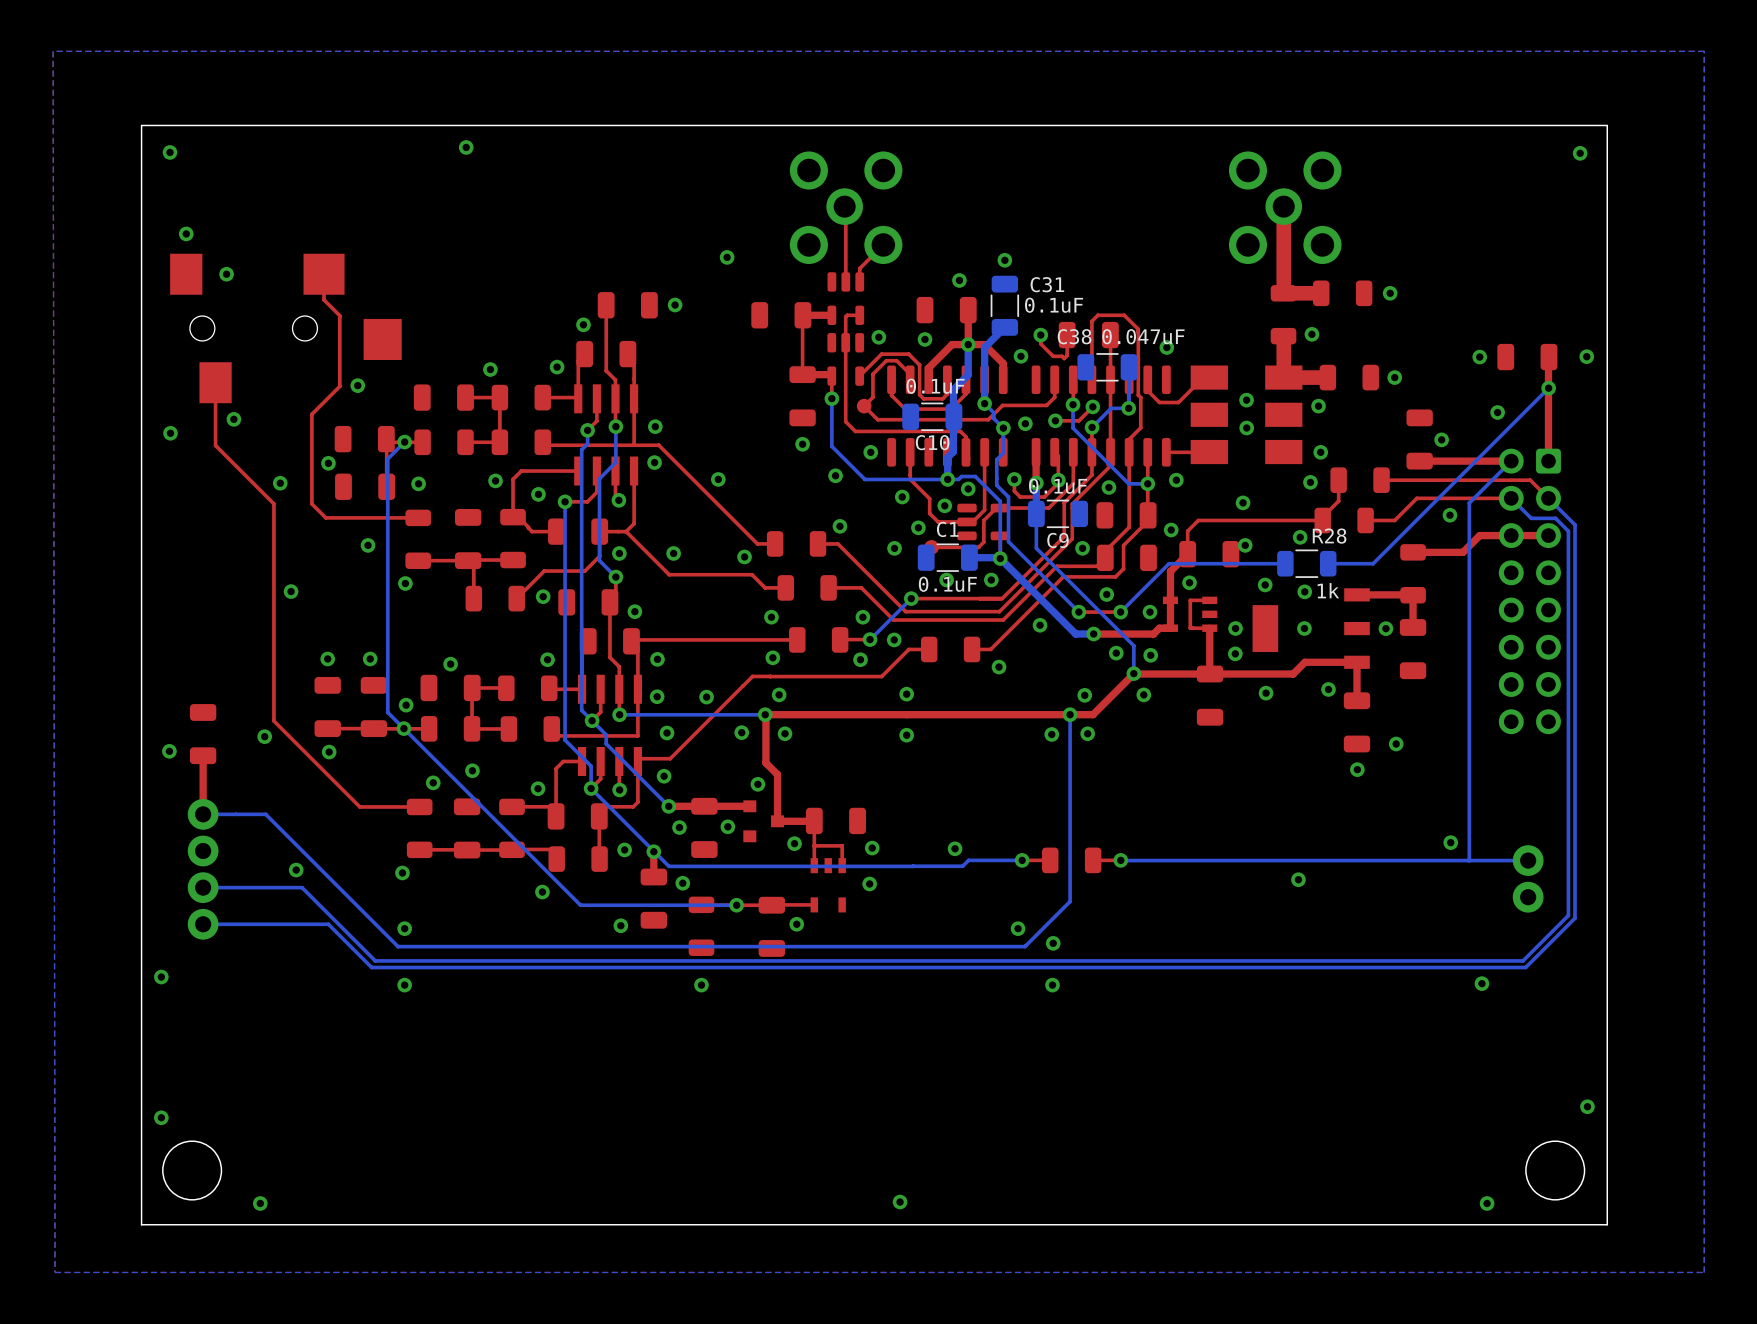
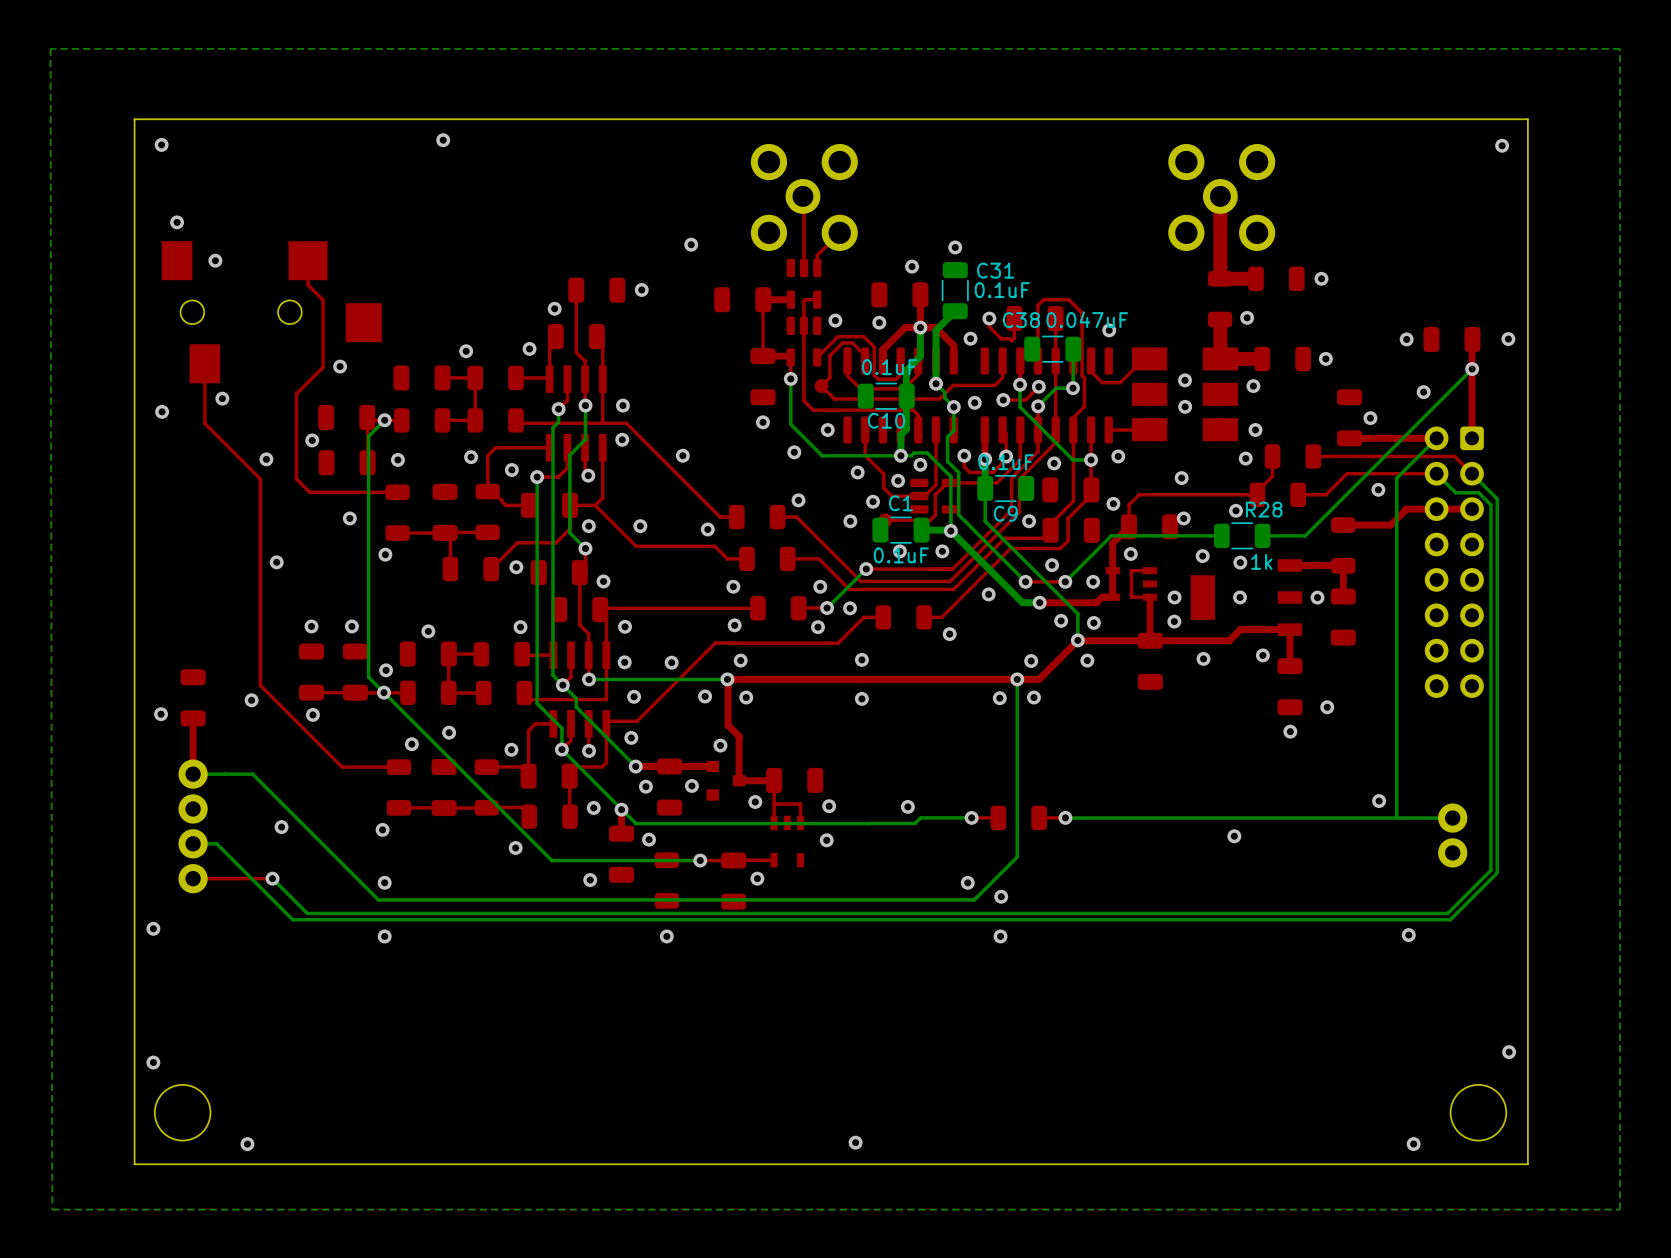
bottom track: (228, 887) (302, 887) (375, 960) -> (216, 843) (292, 919) (353, 919)
bottom track: (203, 924) (328, 924) (371, 967) -> none
top track: none -> (272, 878) (193, 878)
bottom track: none -> (272, 878) (307, 913) (356, 913)
via: none -> (272, 878)

